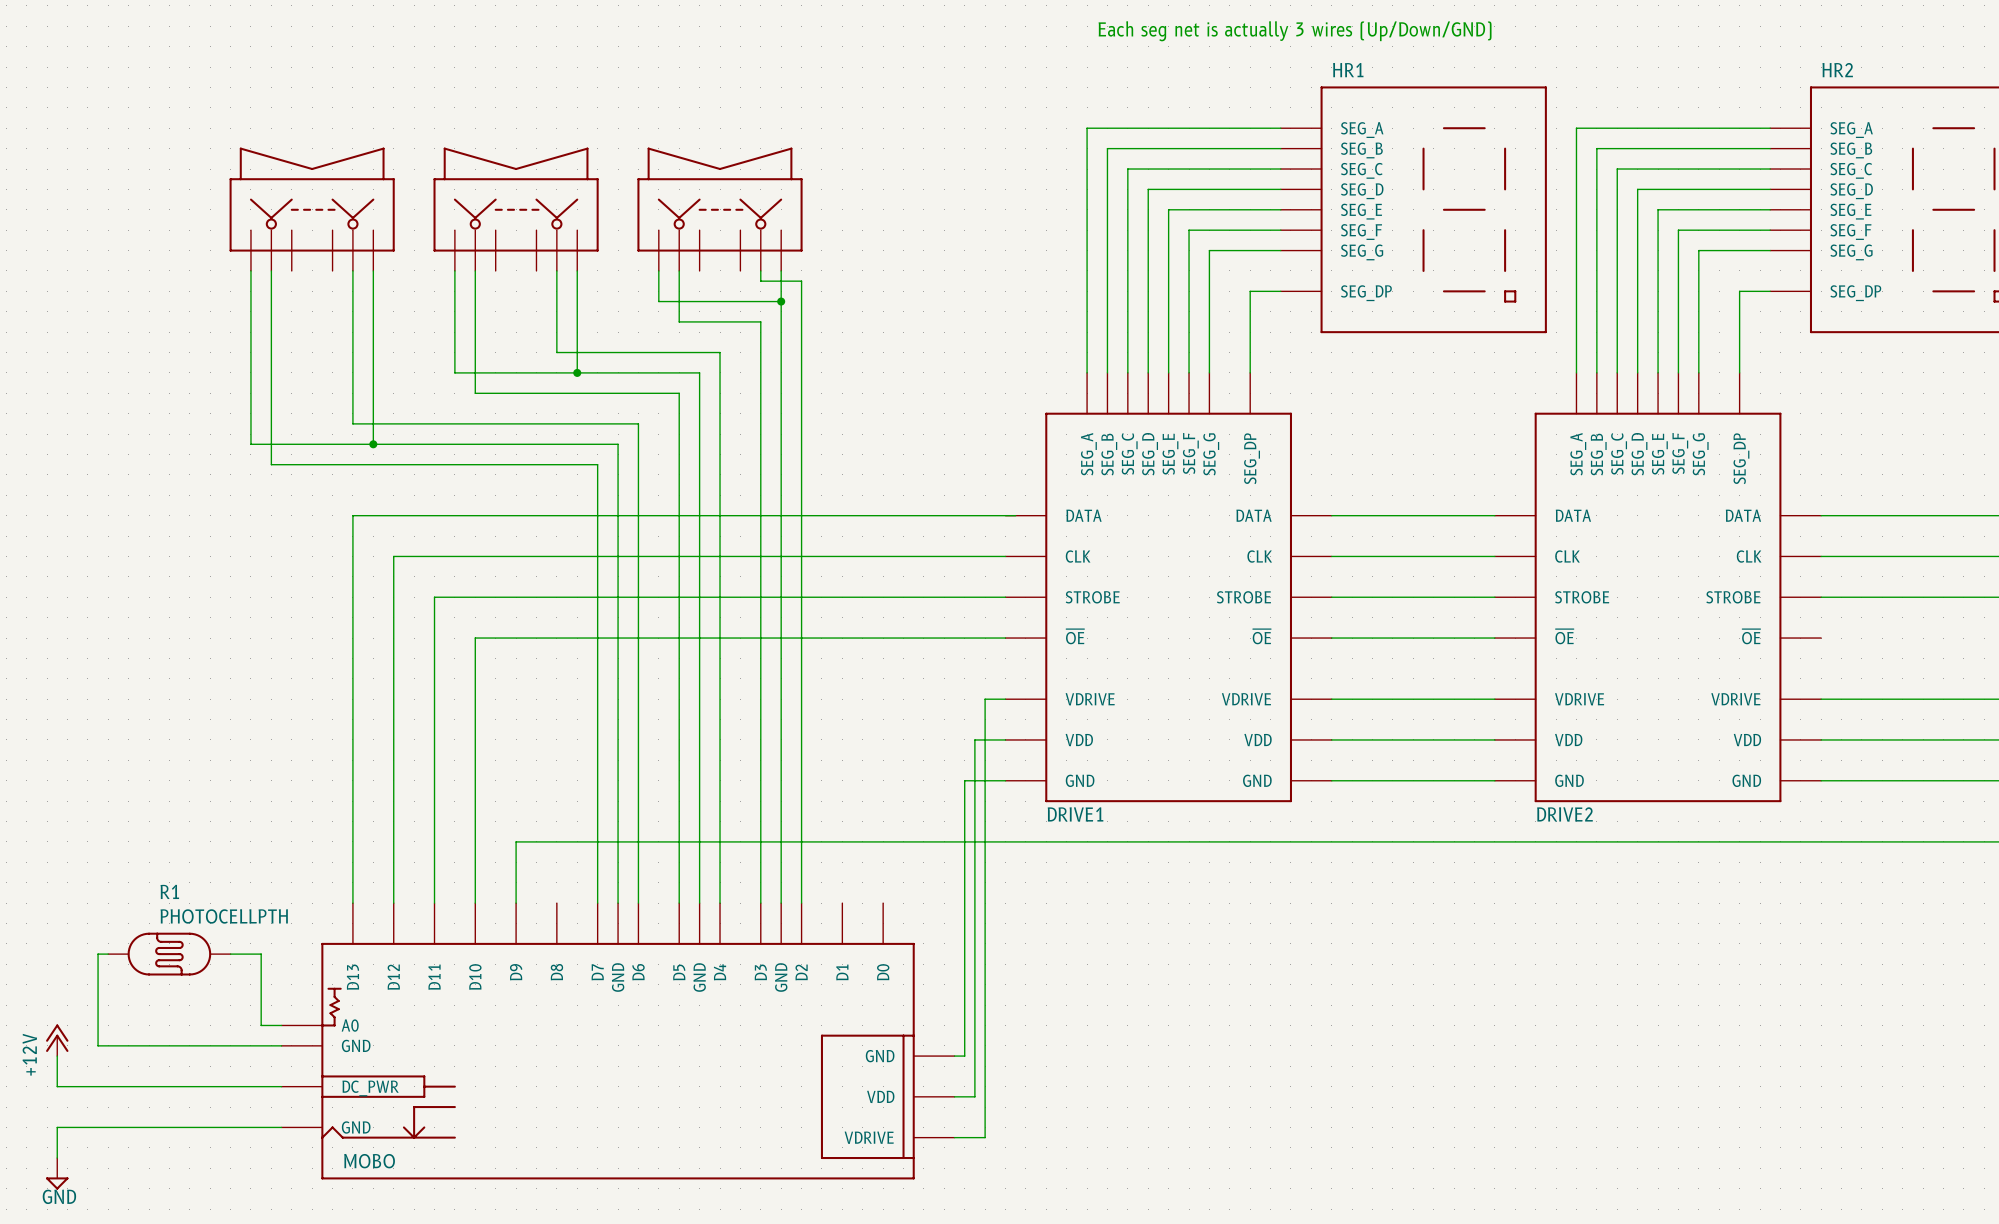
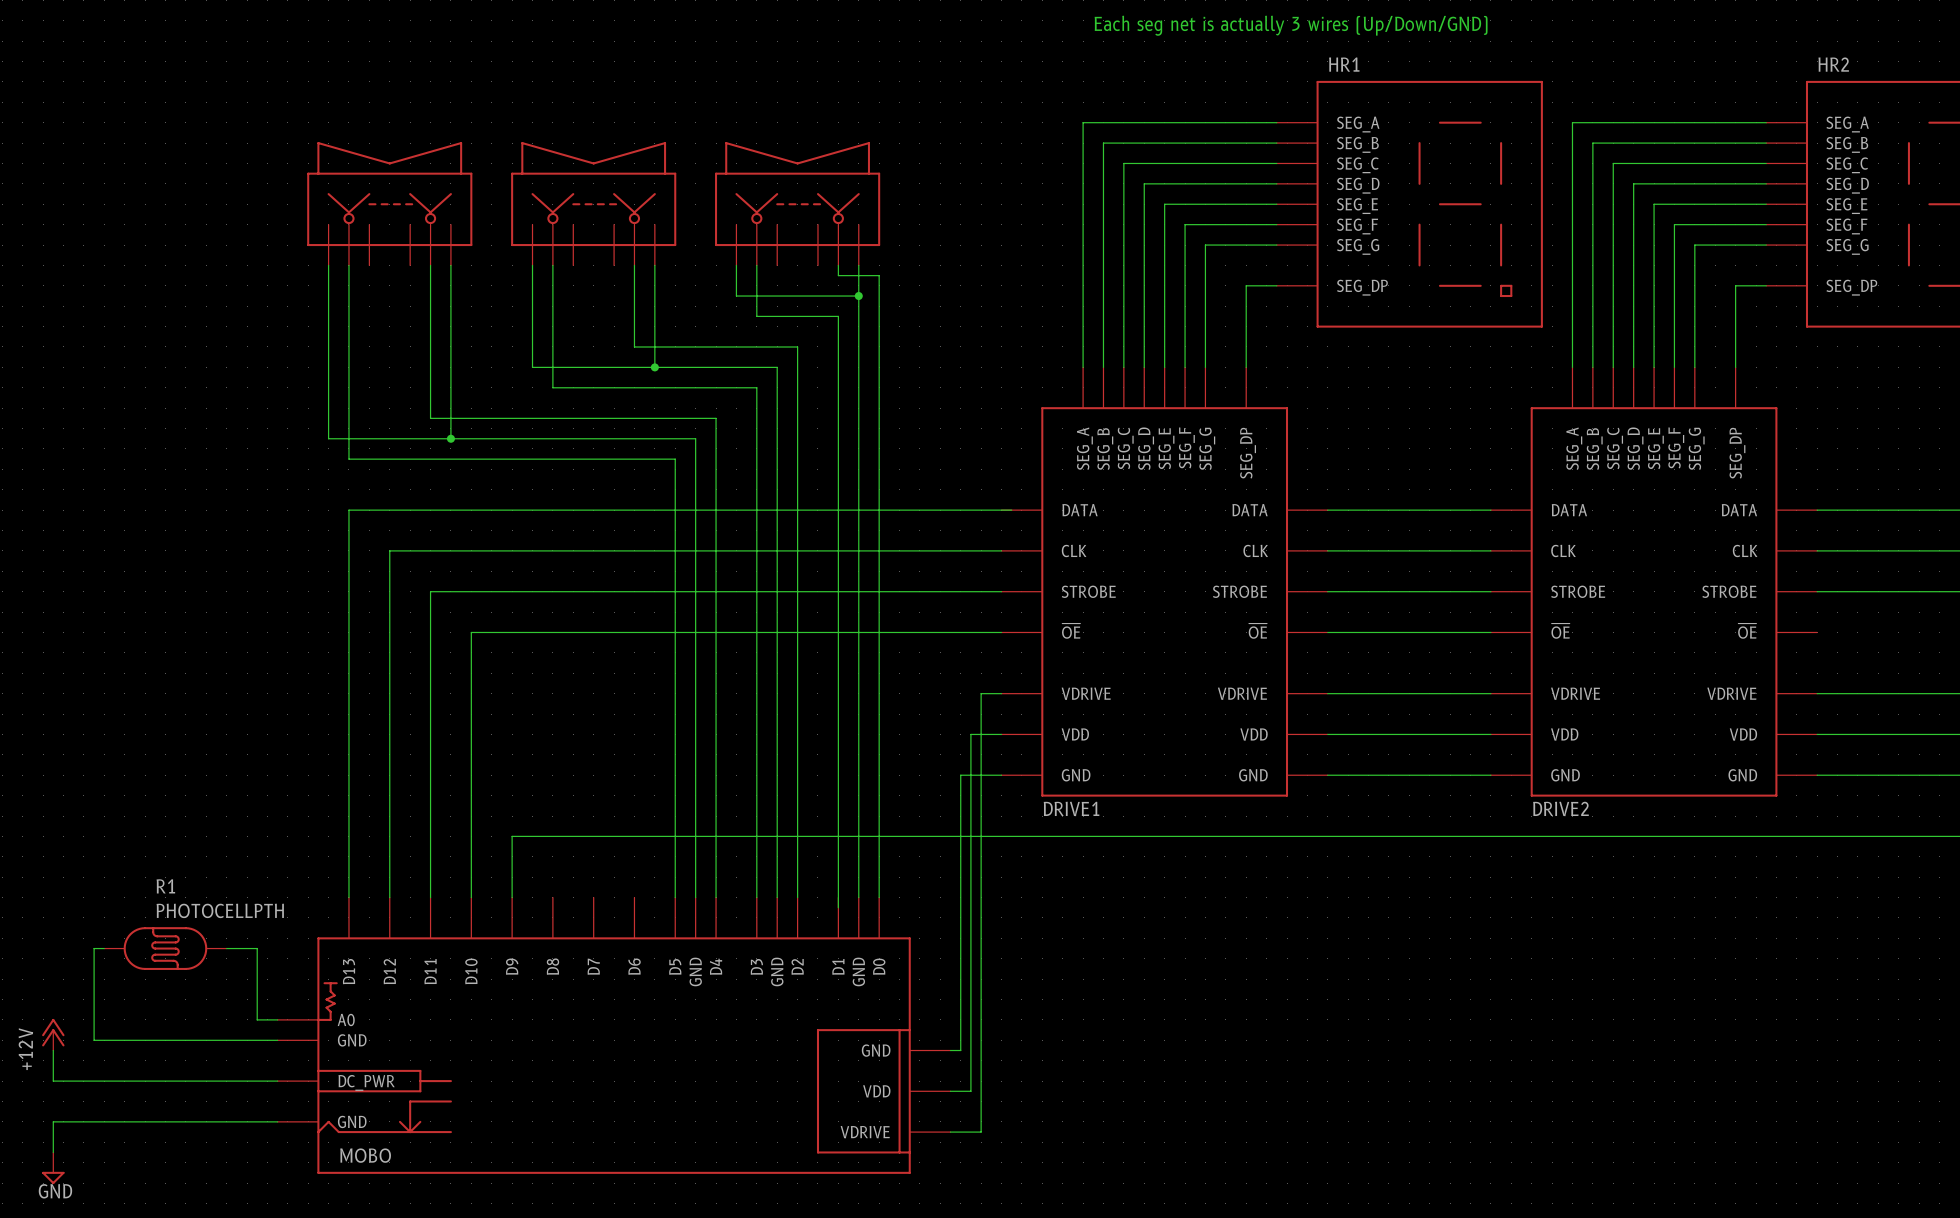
part: (312, 209) -> none
part: none -> (389, 203)
part: (516, 209) -> none
part: none -> (593, 203)
part: (720, 209) -> none
part: none -> (797, 203)
wire: (250, 270) (250, 444) (332, 444) -> (328, 265) (328, 438)
wire: (271, 270) (271, 464) (352, 464) -> none
wire: (373, 270) (373, 444) -> none
wire: none -> (430, 265) (430, 418)
wire: (475, 270) (475, 393) (556, 393) -> none
wire: (577, 270) (577, 372) -> (532, 265) (532, 367)
wire: none -> (634, 265) (634, 346)
wire: (679, 270) (679, 321) (760, 321) (760, 393) -> none
wire: (781, 270) (781, 372) -> none
wire: none -> (838, 265) (838, 275) (879, 275) (879, 897)
wire: none -> (858, 265) (858, 897)
wire: (760, 281) (801, 281) (801, 352) -> (716, 346) (797, 346)
wire: none -> (756, 275) (756, 316) (838, 316) (838, 907)
wire: (658, 301) (740, 301) -> (736, 265) (736, 296)
wire: none -> (654, 296) (654, 367)
wire: none -> (777, 296) (858, 296)
junction: (781, 301) -> none
junction: none -> (858, 296)
wire: (556, 352) (638, 352) -> (552, 346) (552, 387)
wire: (720, 352) (720, 423) -> (634, 418) (716, 418)
wire: (454, 372) (536, 372) -> (450, 367) (450, 438)
junction: (577, 372) -> none
junction: none -> (654, 367)
wire: (699, 372) (699, 444) -> (695, 367) (777, 367)
wire: (679, 393) (679, 464) -> (675, 387) (756, 387)
wire: (352, 423) (434, 423) -> (348, 418) (348, 459)
wire: (638, 423) (638, 903) -> none
junction: (373, 444) -> none
junction: none -> (450, 438)
wire: (618, 444) (618, 903) -> (614, 438) (695, 438)
wire: (597, 464) (597, 903) -> (593, 459) (675, 459)
MOBO symbol: [281, 903, 955, 1180] -> [277, 897, 951, 1174]

